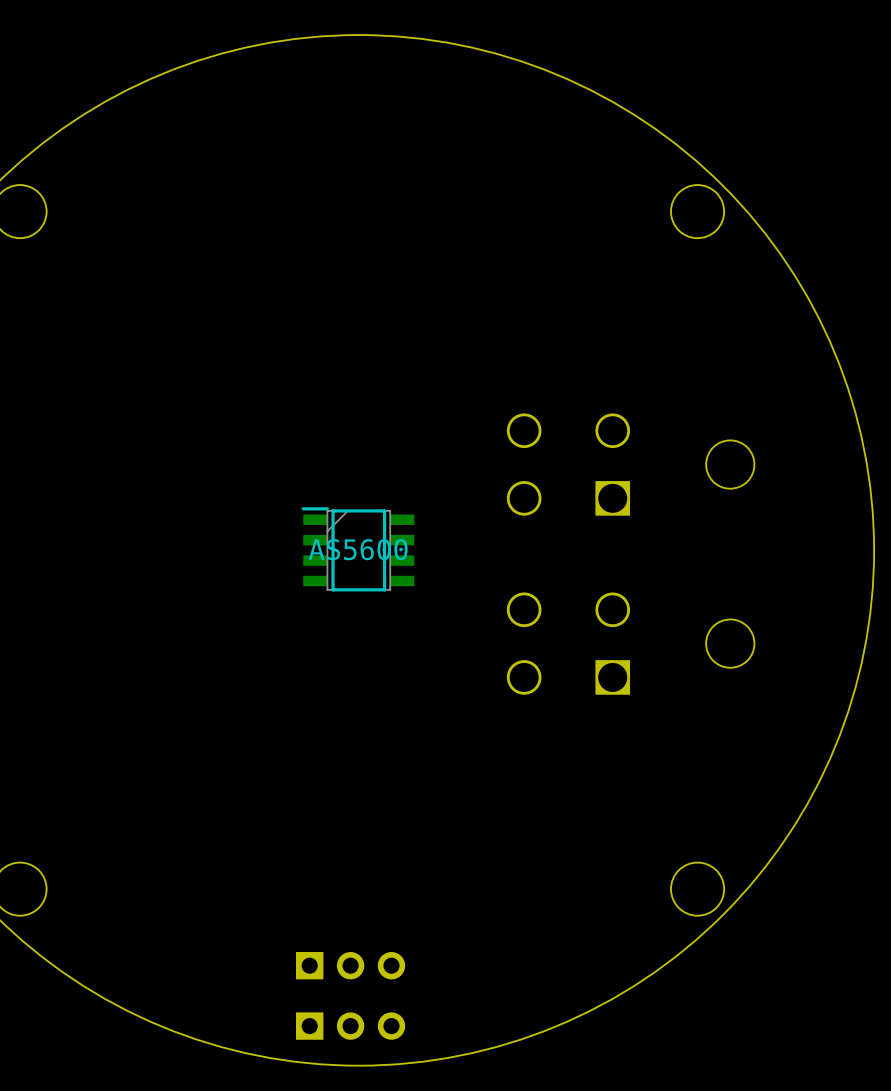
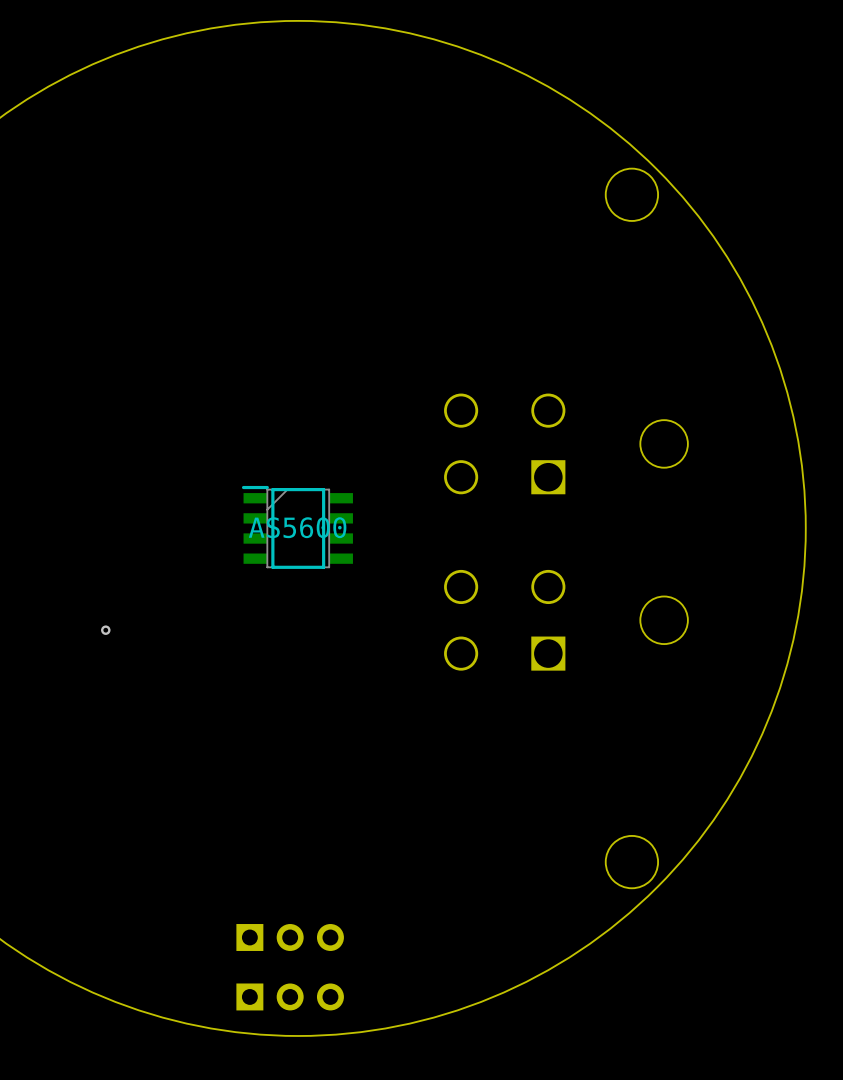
via: none -> (105, 630)

